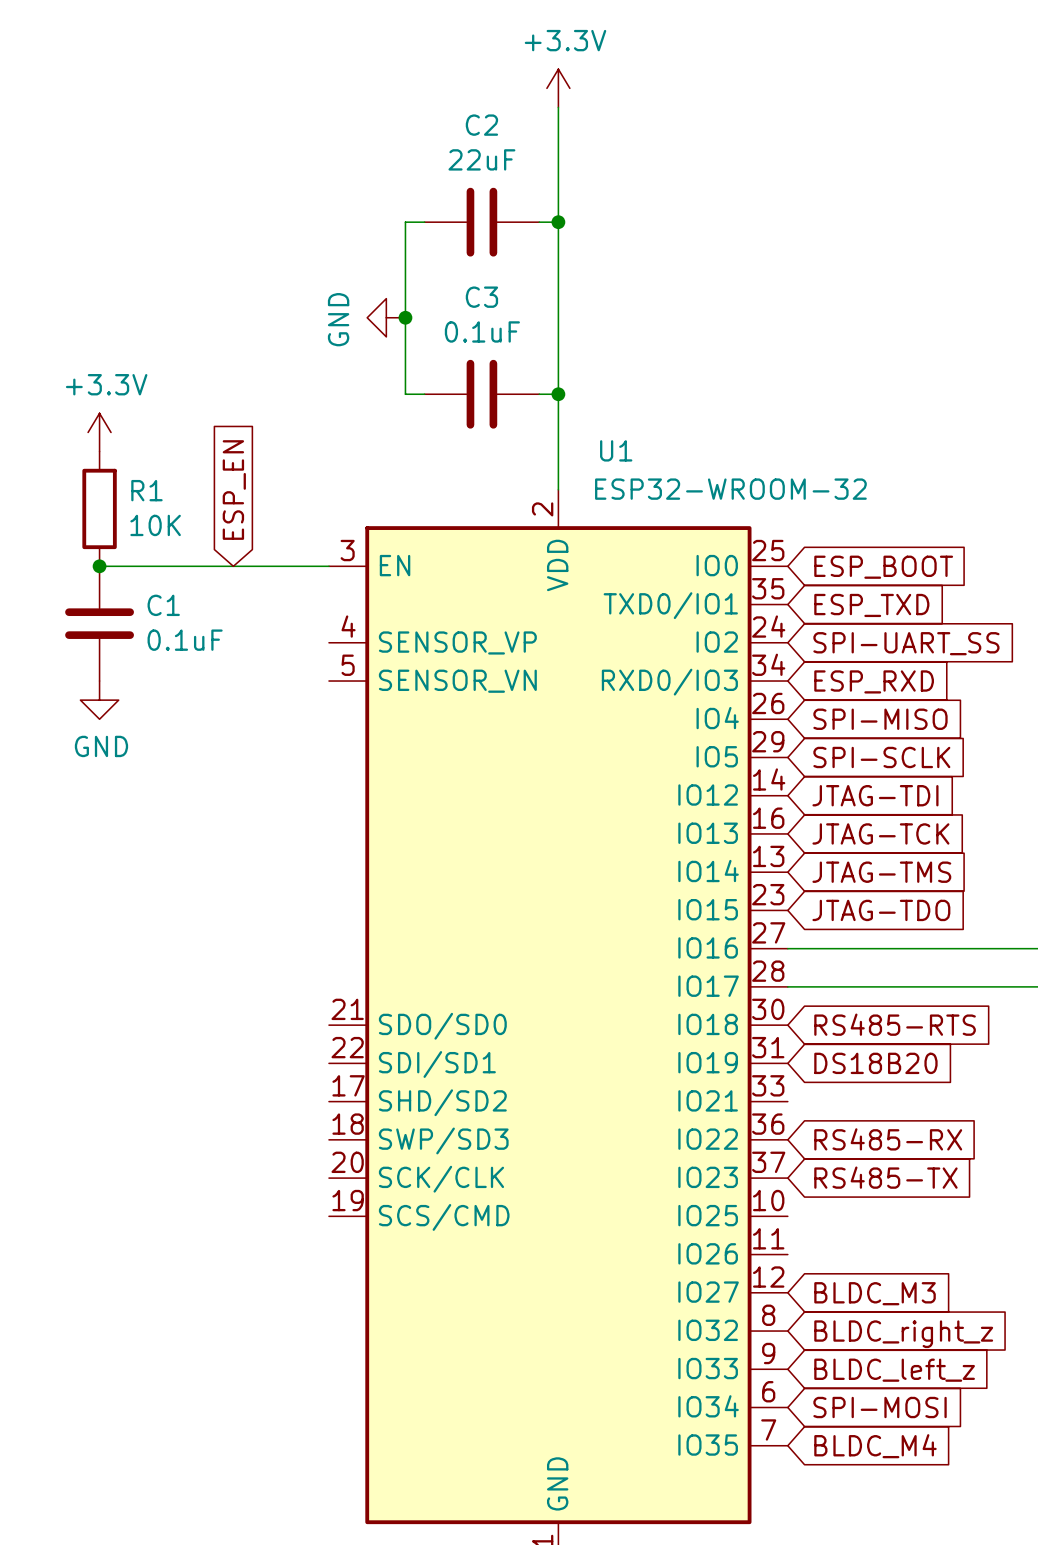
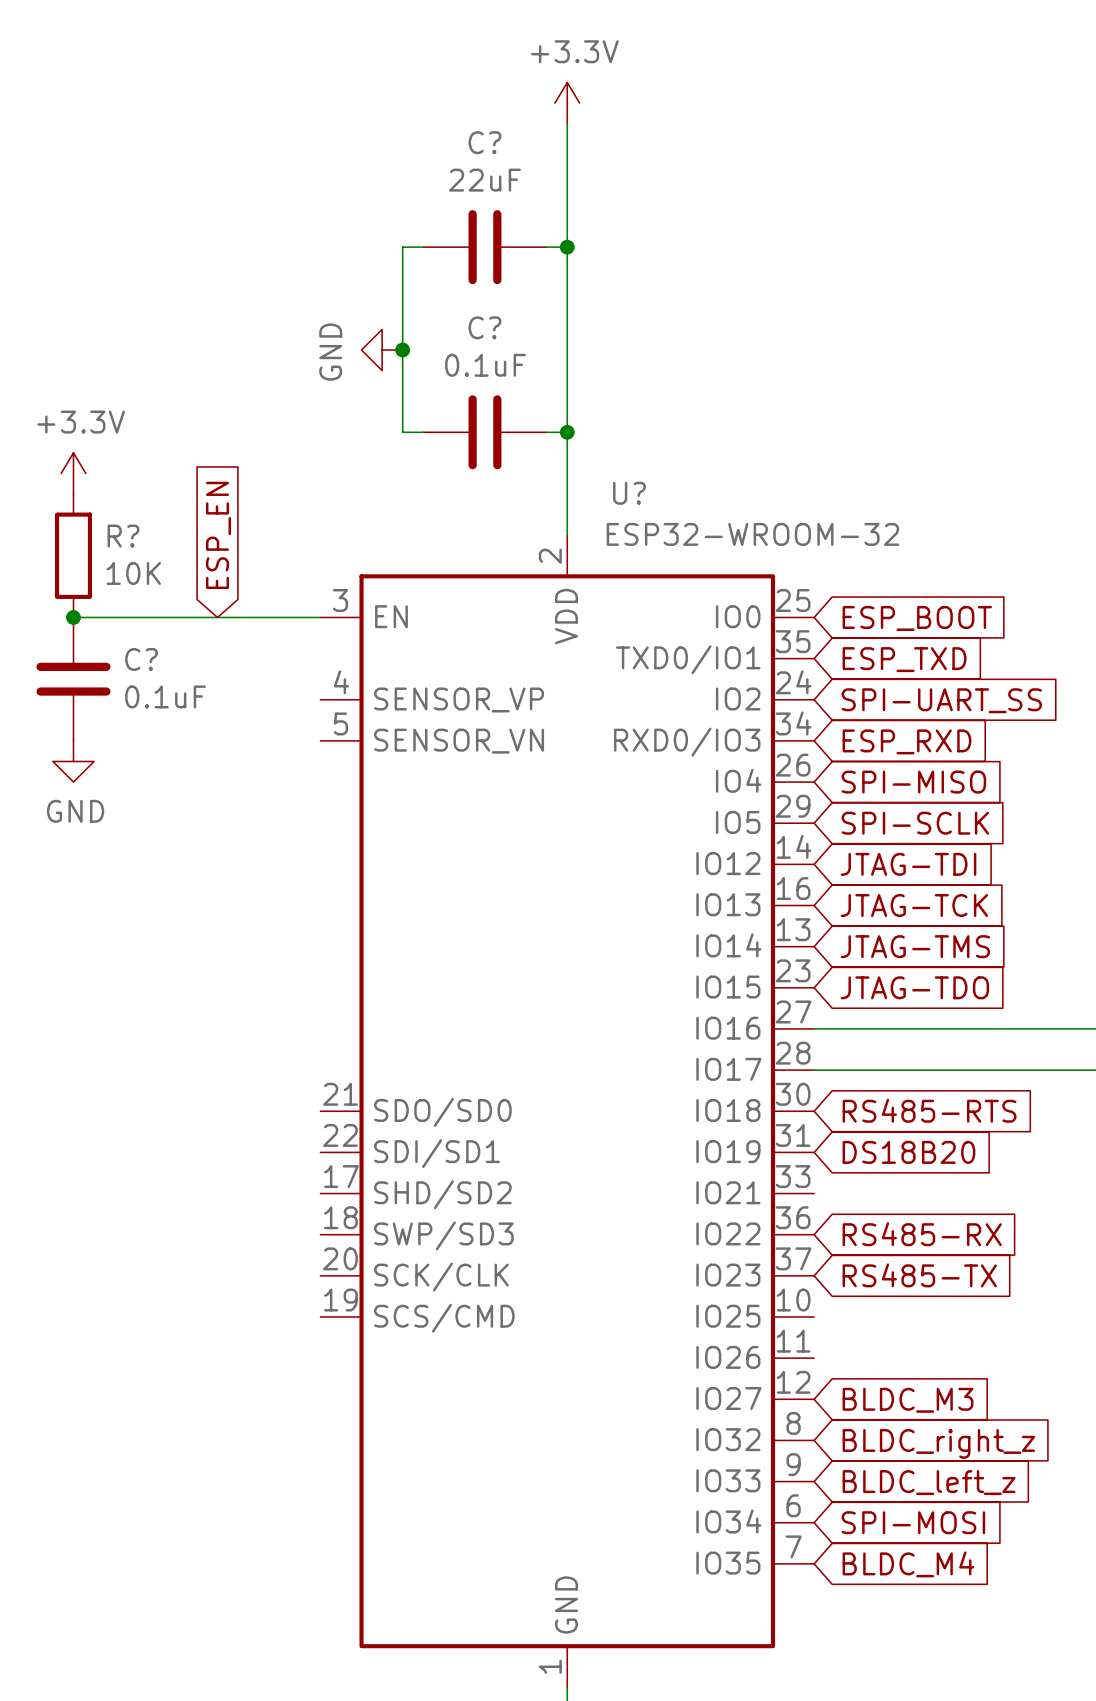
C2 name: C2 (481, 125) -> C? (484, 142)
C3 name: C3 (481, 297) -> C? (484, 327)
U1 name: U1 (616, 450) -> U? (629, 493)
R1 name: R1 (146, 490) -> R? (123, 536)
C1 name: C1 (163, 605) -> C? (141, 659)

